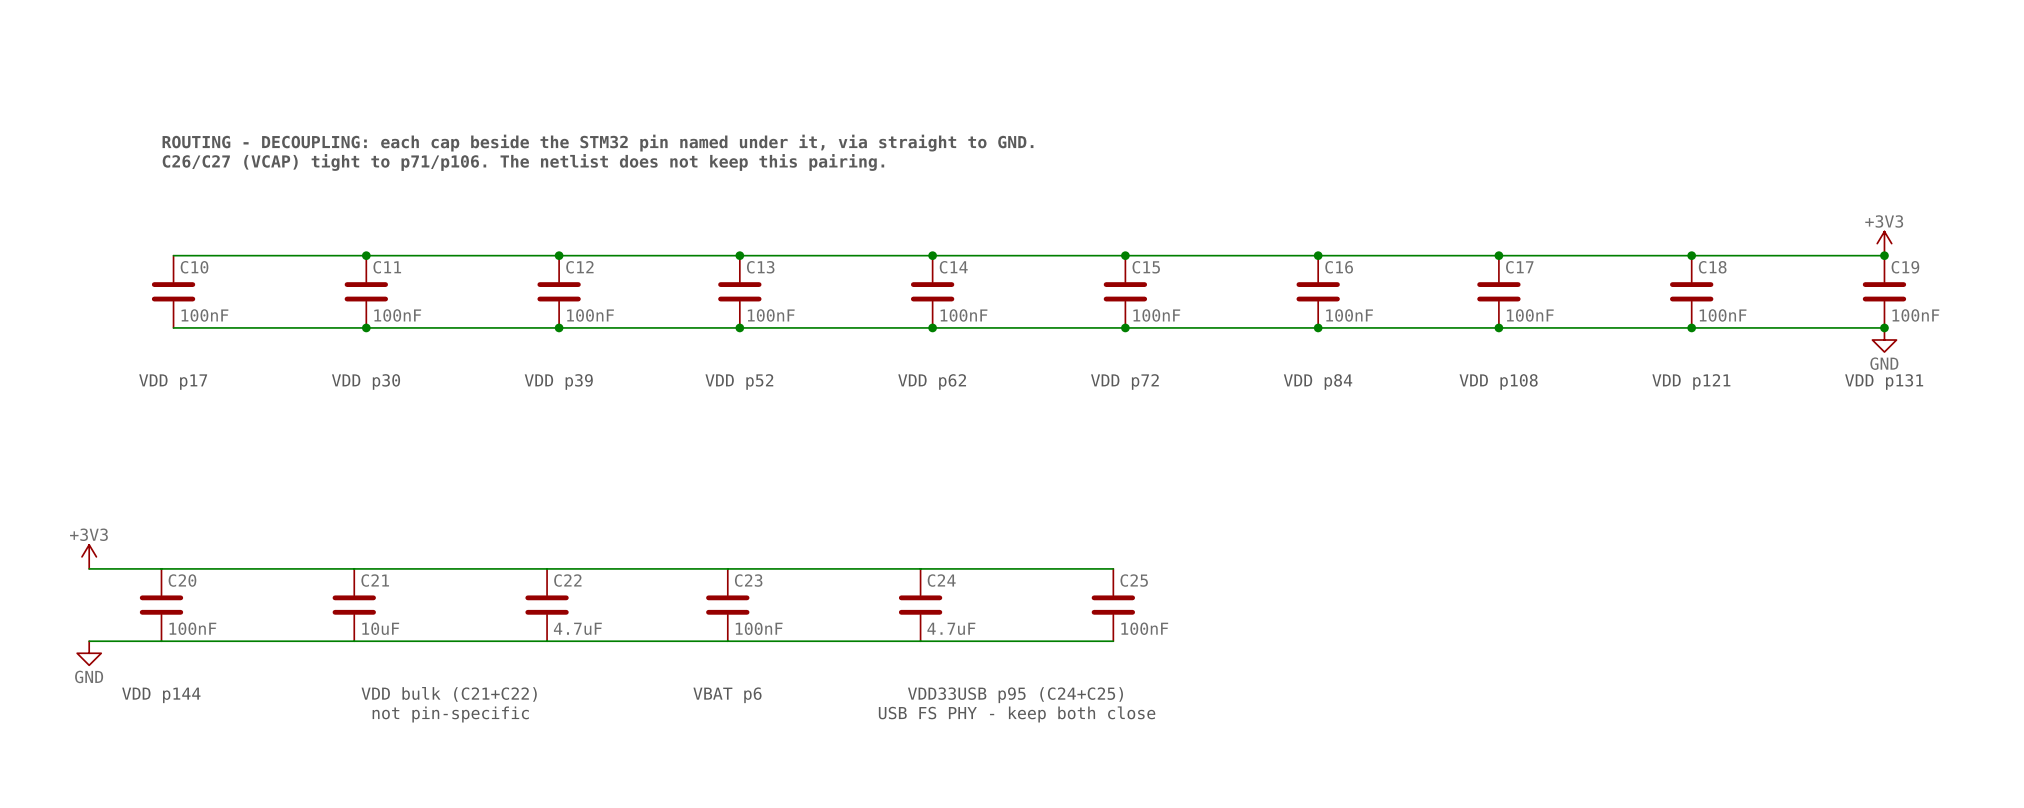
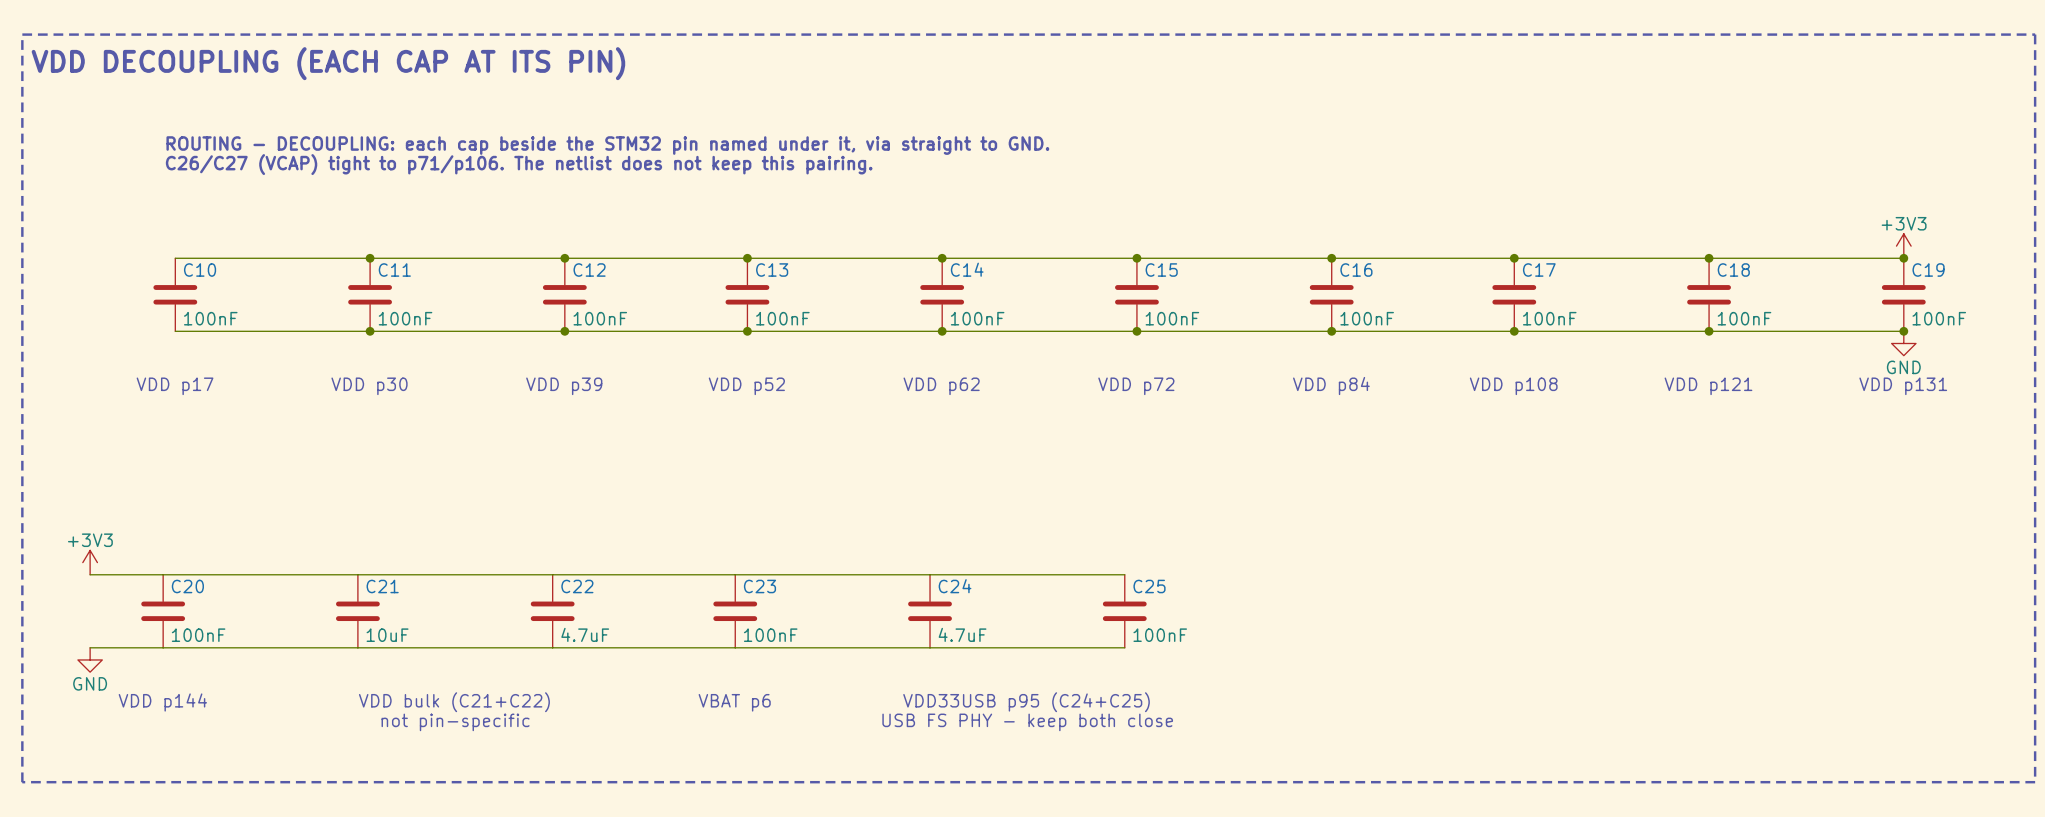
line: none -> (22, 34) (2035, 34) (2035, 782) (22, 782) (22, 34)
text: none -> VDD DECOUPLING (EACH CAP AT ITS PIN) (328, 63)

